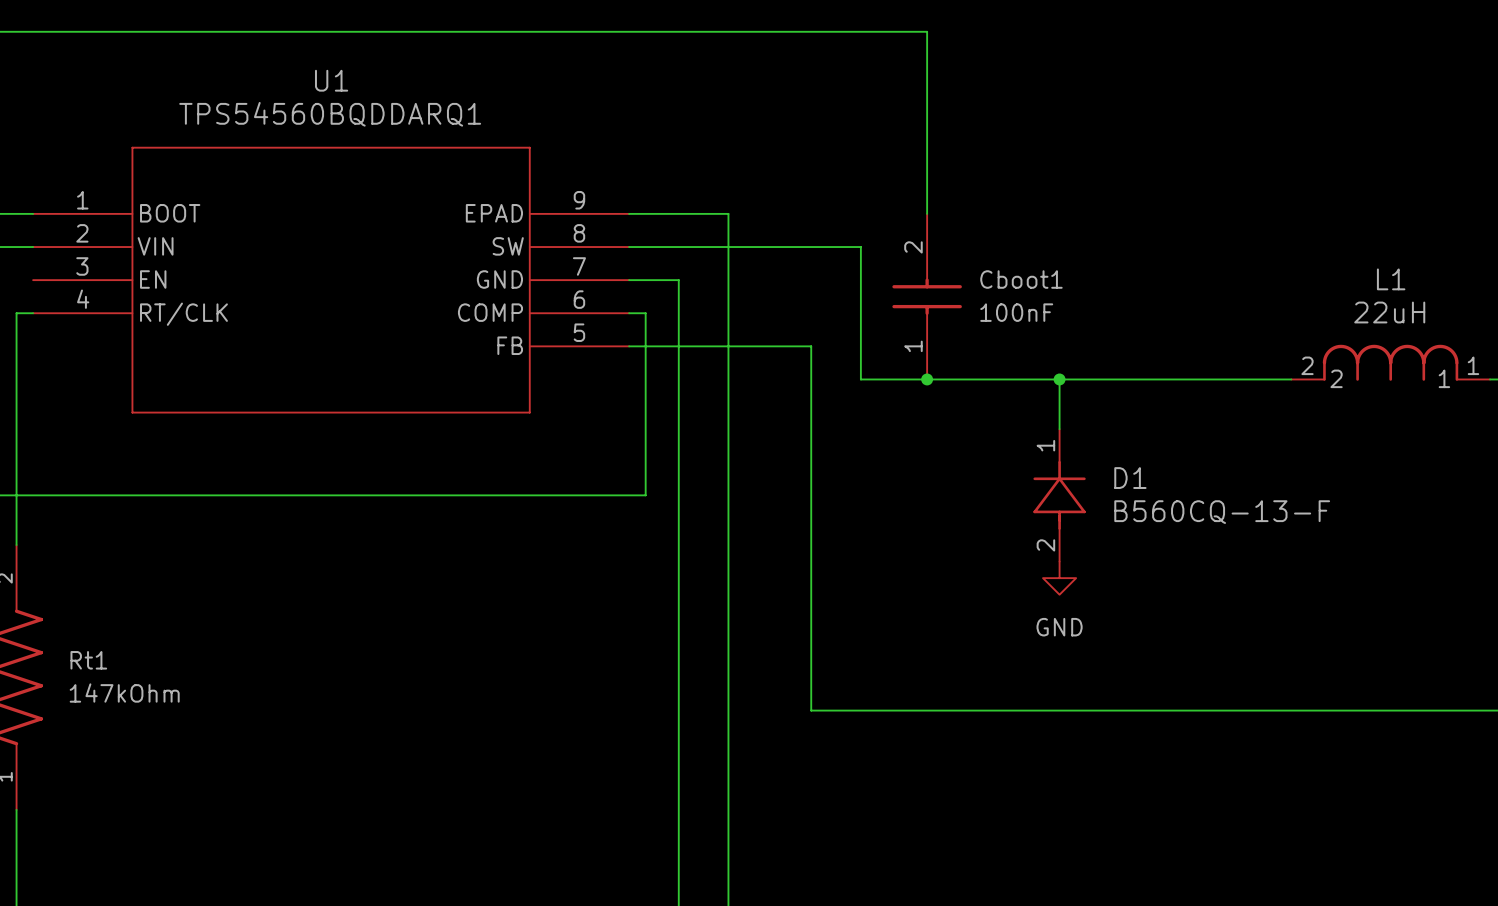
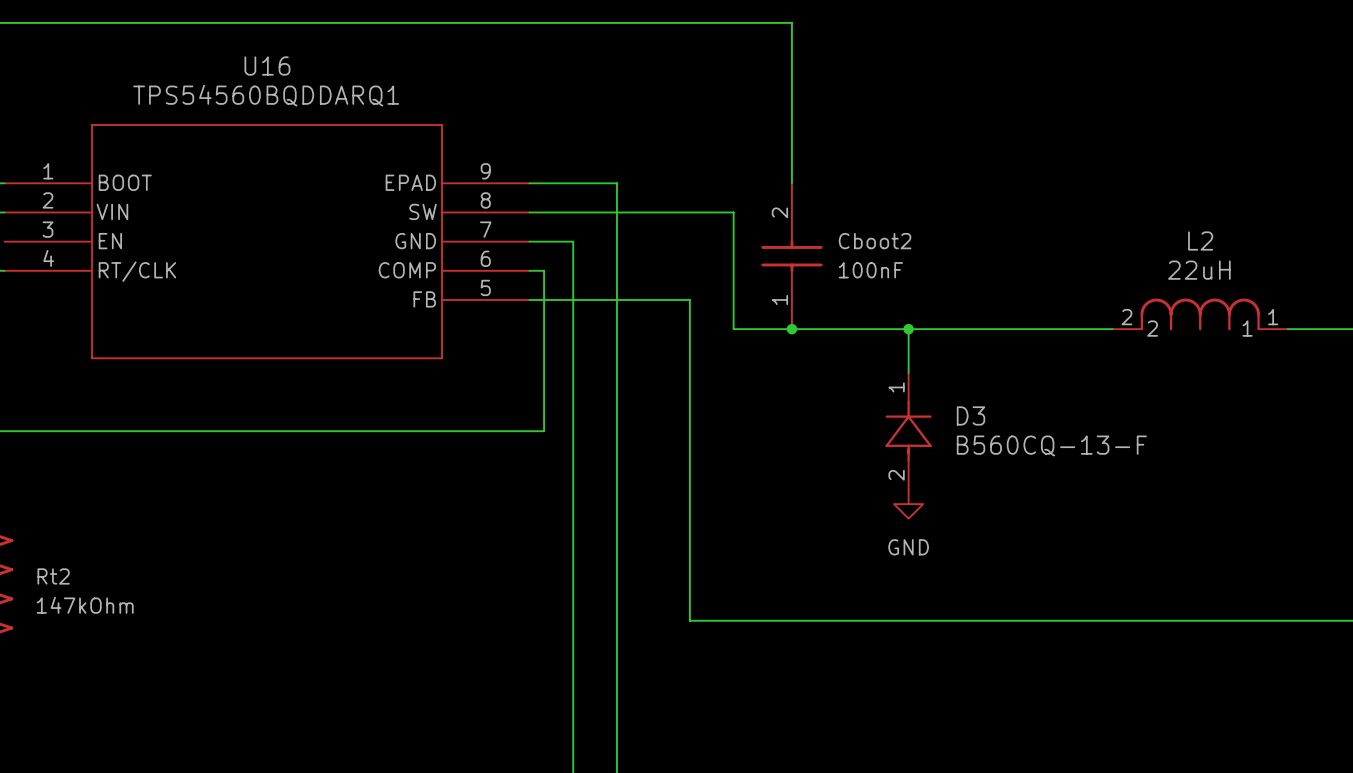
U1 name: U1 (331, 80) -> U16 (267, 66)
Cboot1 name: Cboot1 (1021, 279) -> Cboot2 (875, 241)
L1 name: L1 (1391, 279) -> L2 (1200, 240)
D1 name: D1 (1130, 478) -> D3 (971, 415)
Rt1 name: Rt1 (88, 660) -> Rt2 (53, 576)

